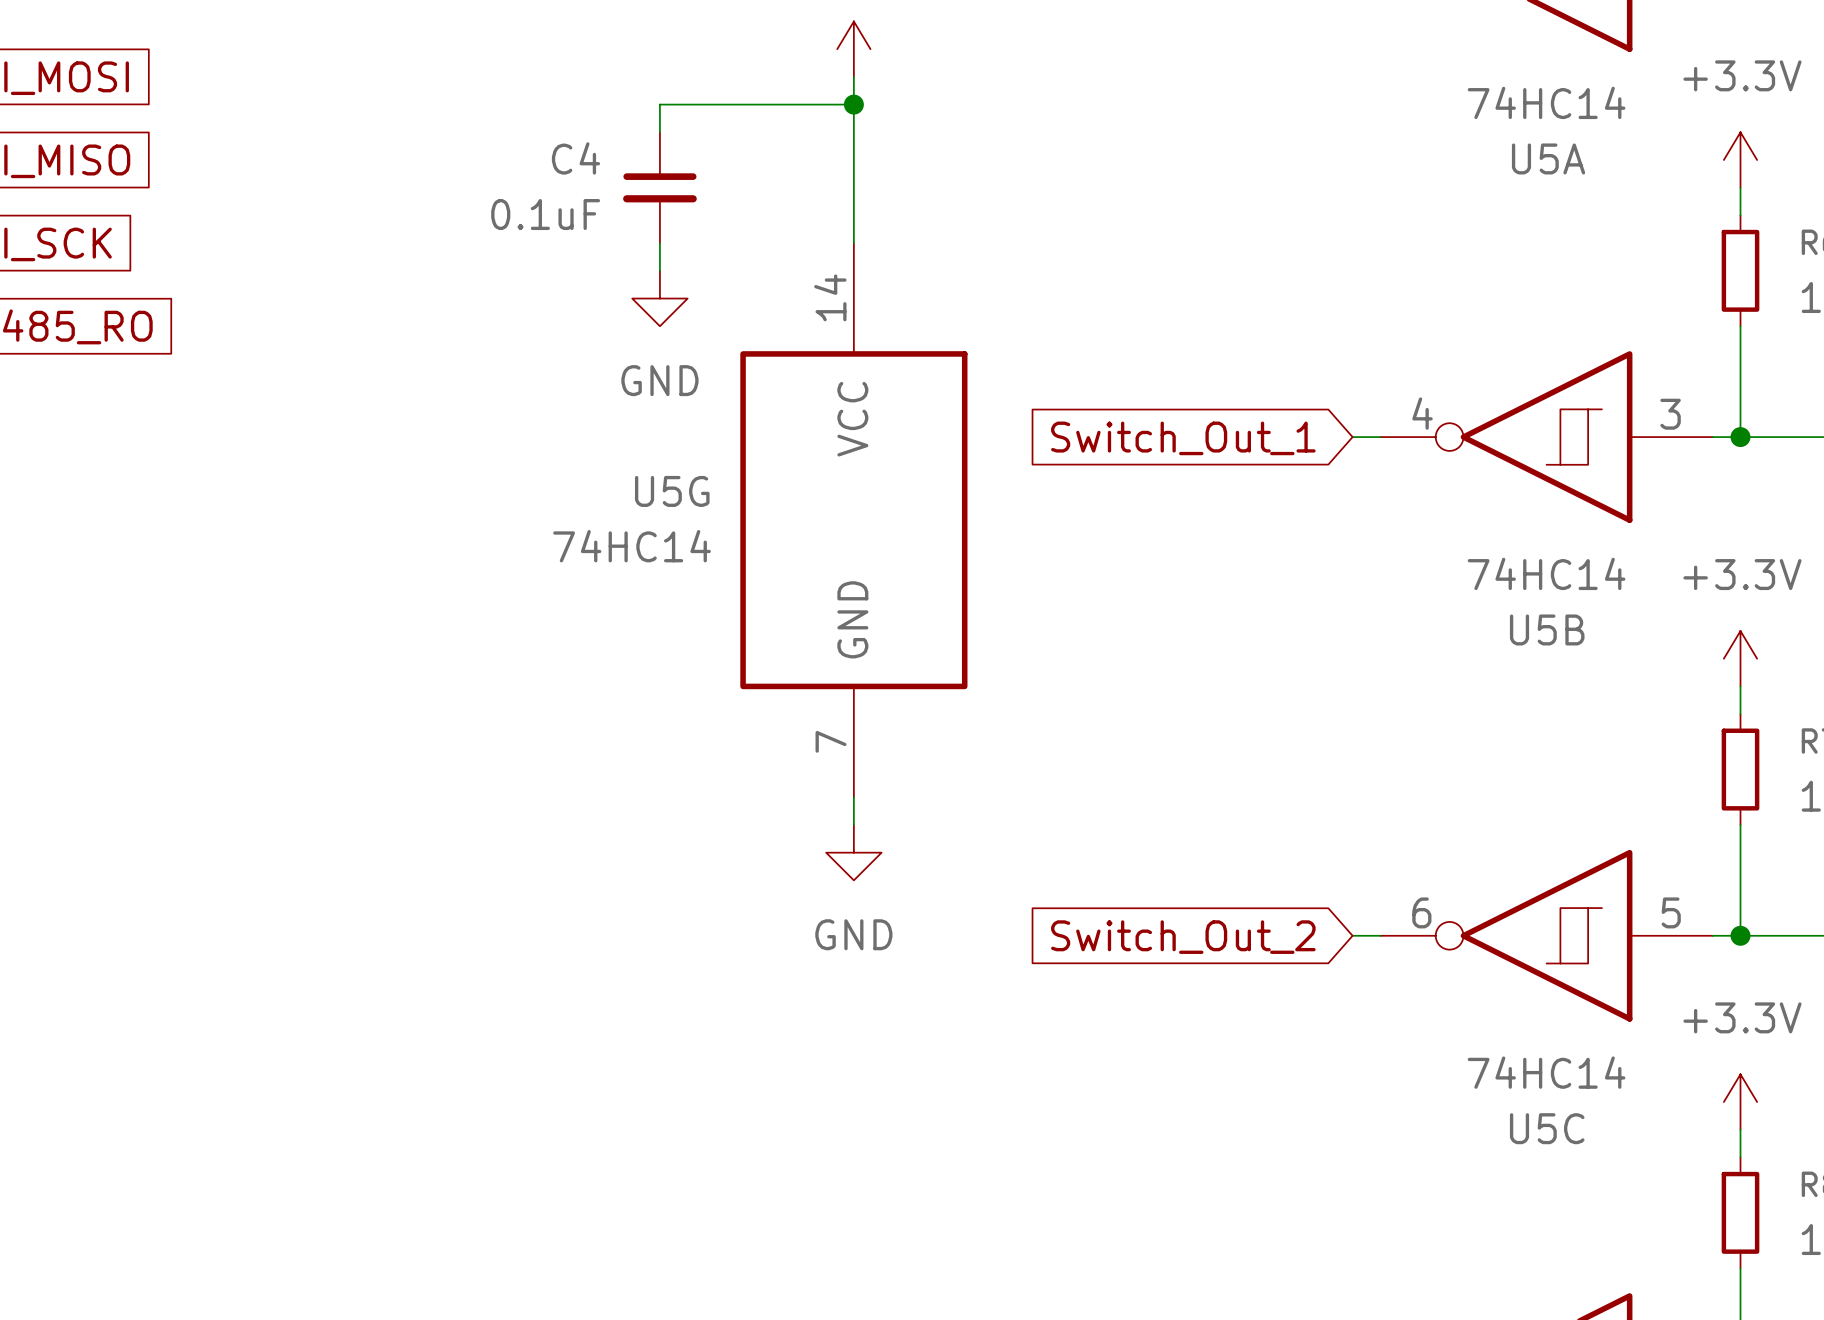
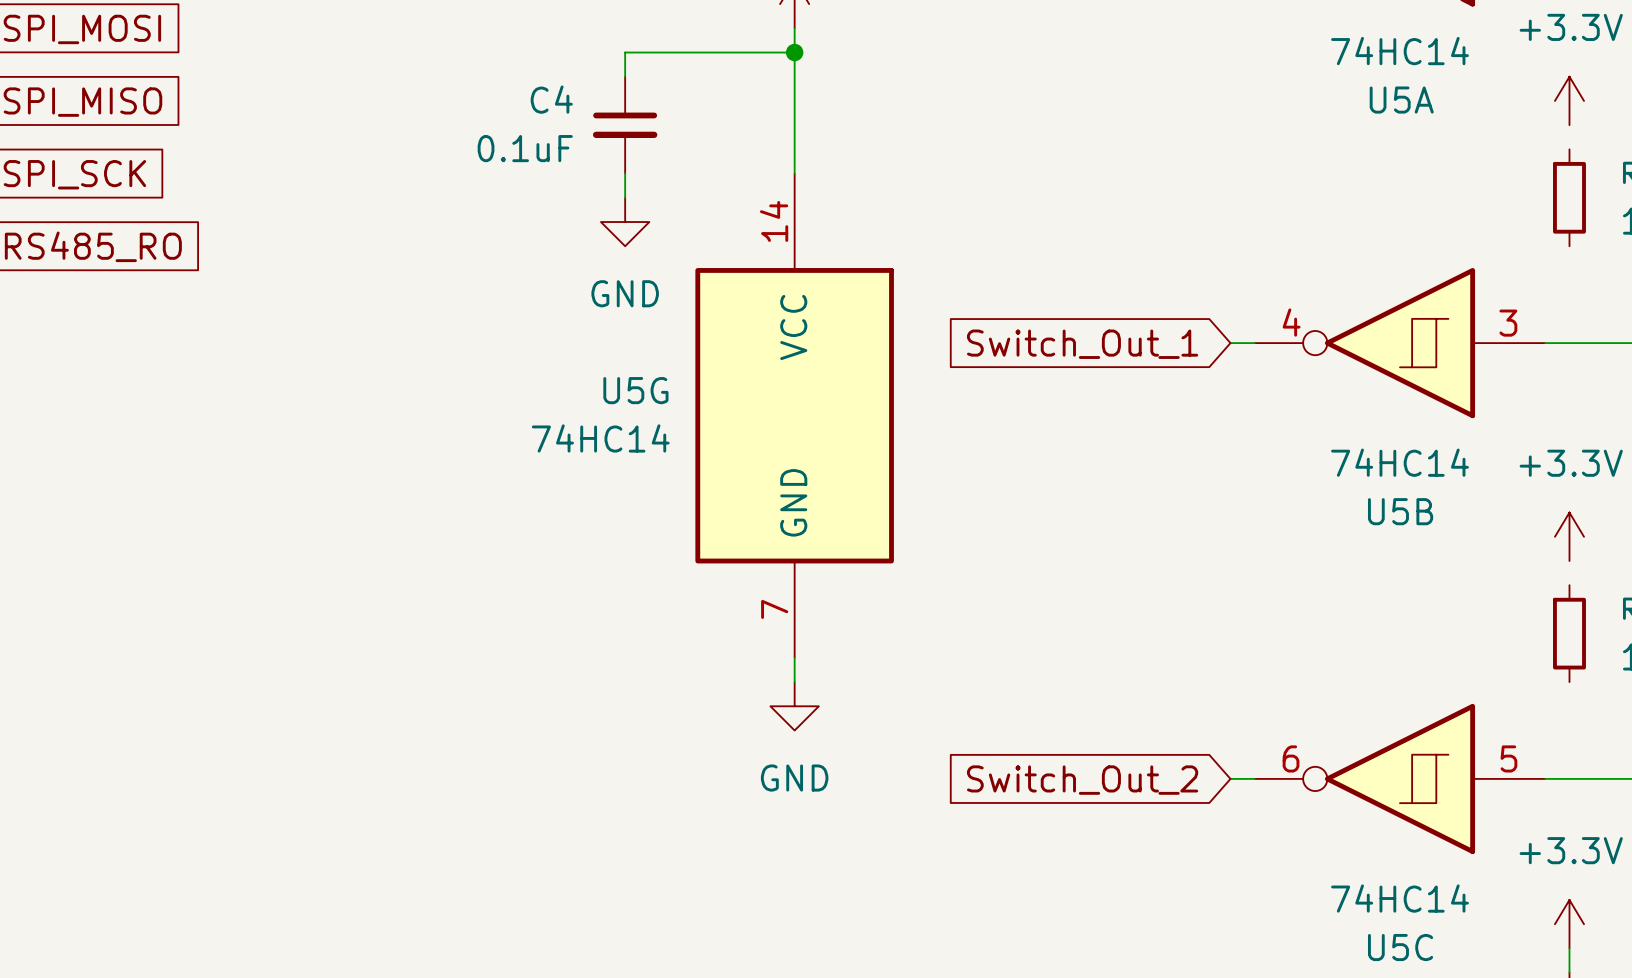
wire: (1740, 187) (1740, 215) -> none
wire: (1740, 326) (1740, 437) -> none
junction: (1740, 437) -> none
wire: (1740, 686) (1740, 714) -> none
wire: (1740, 824) (1740, 935) -> none
junction: (1740, 935) -> none

